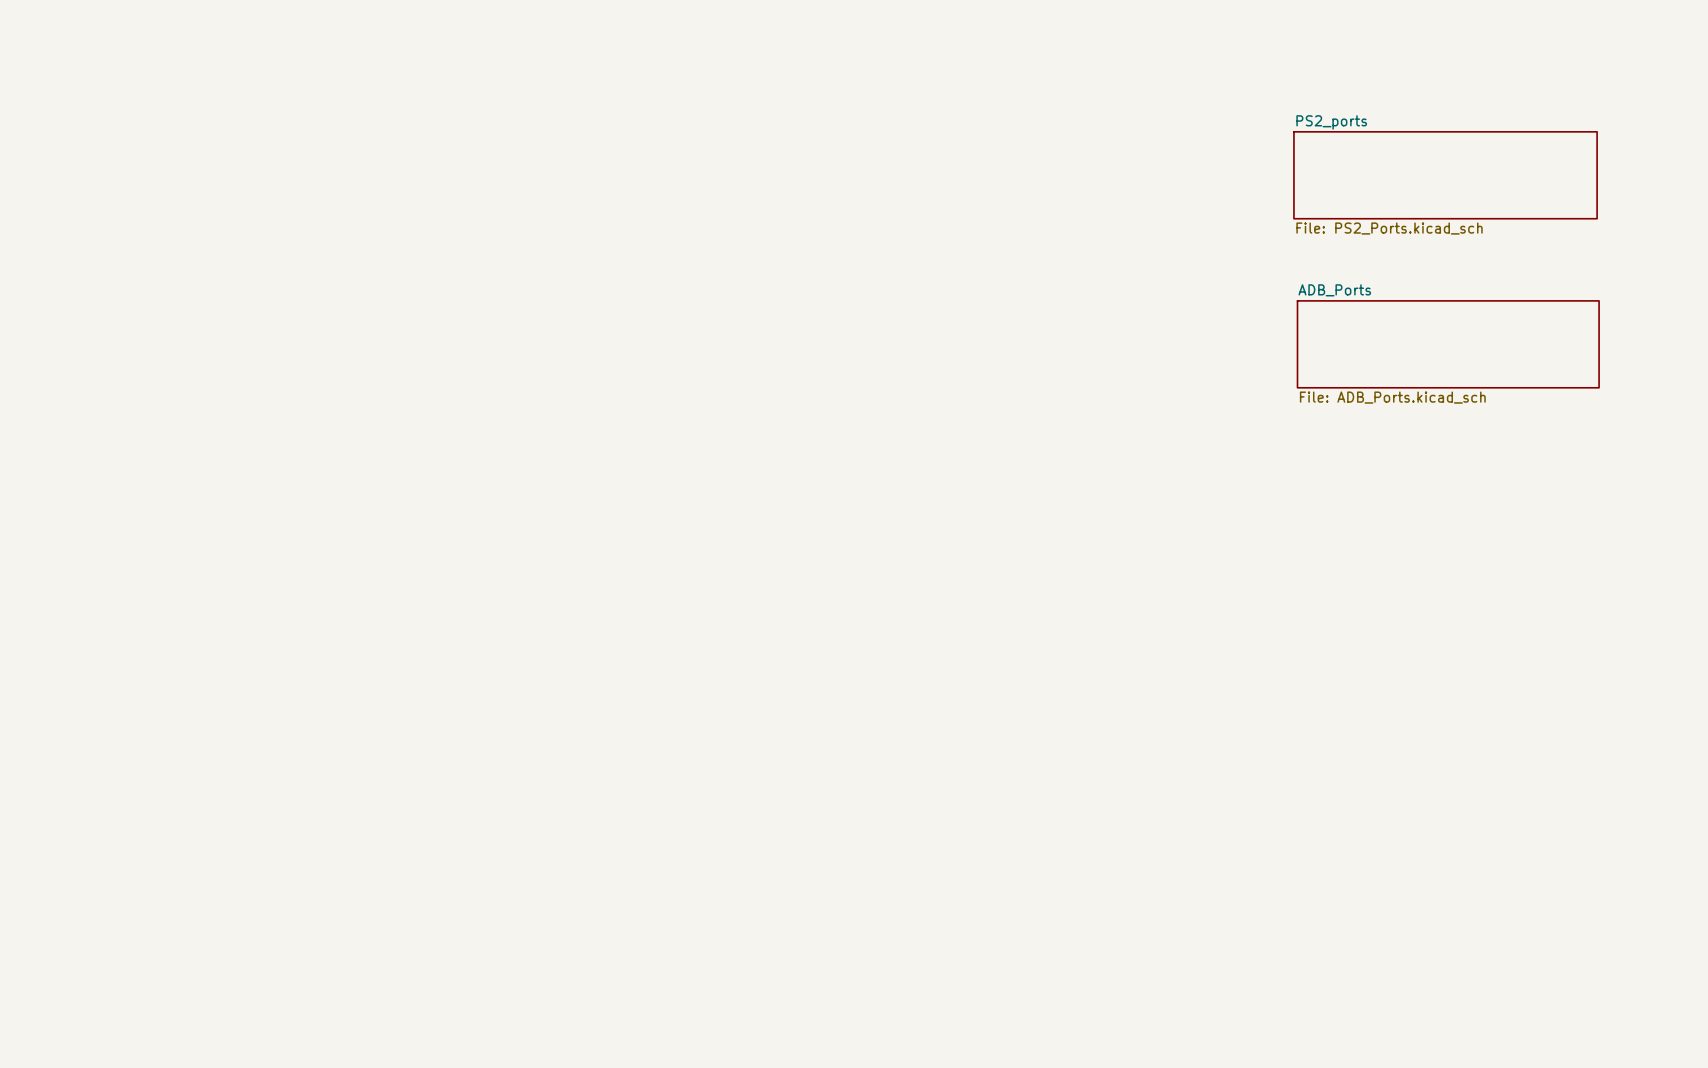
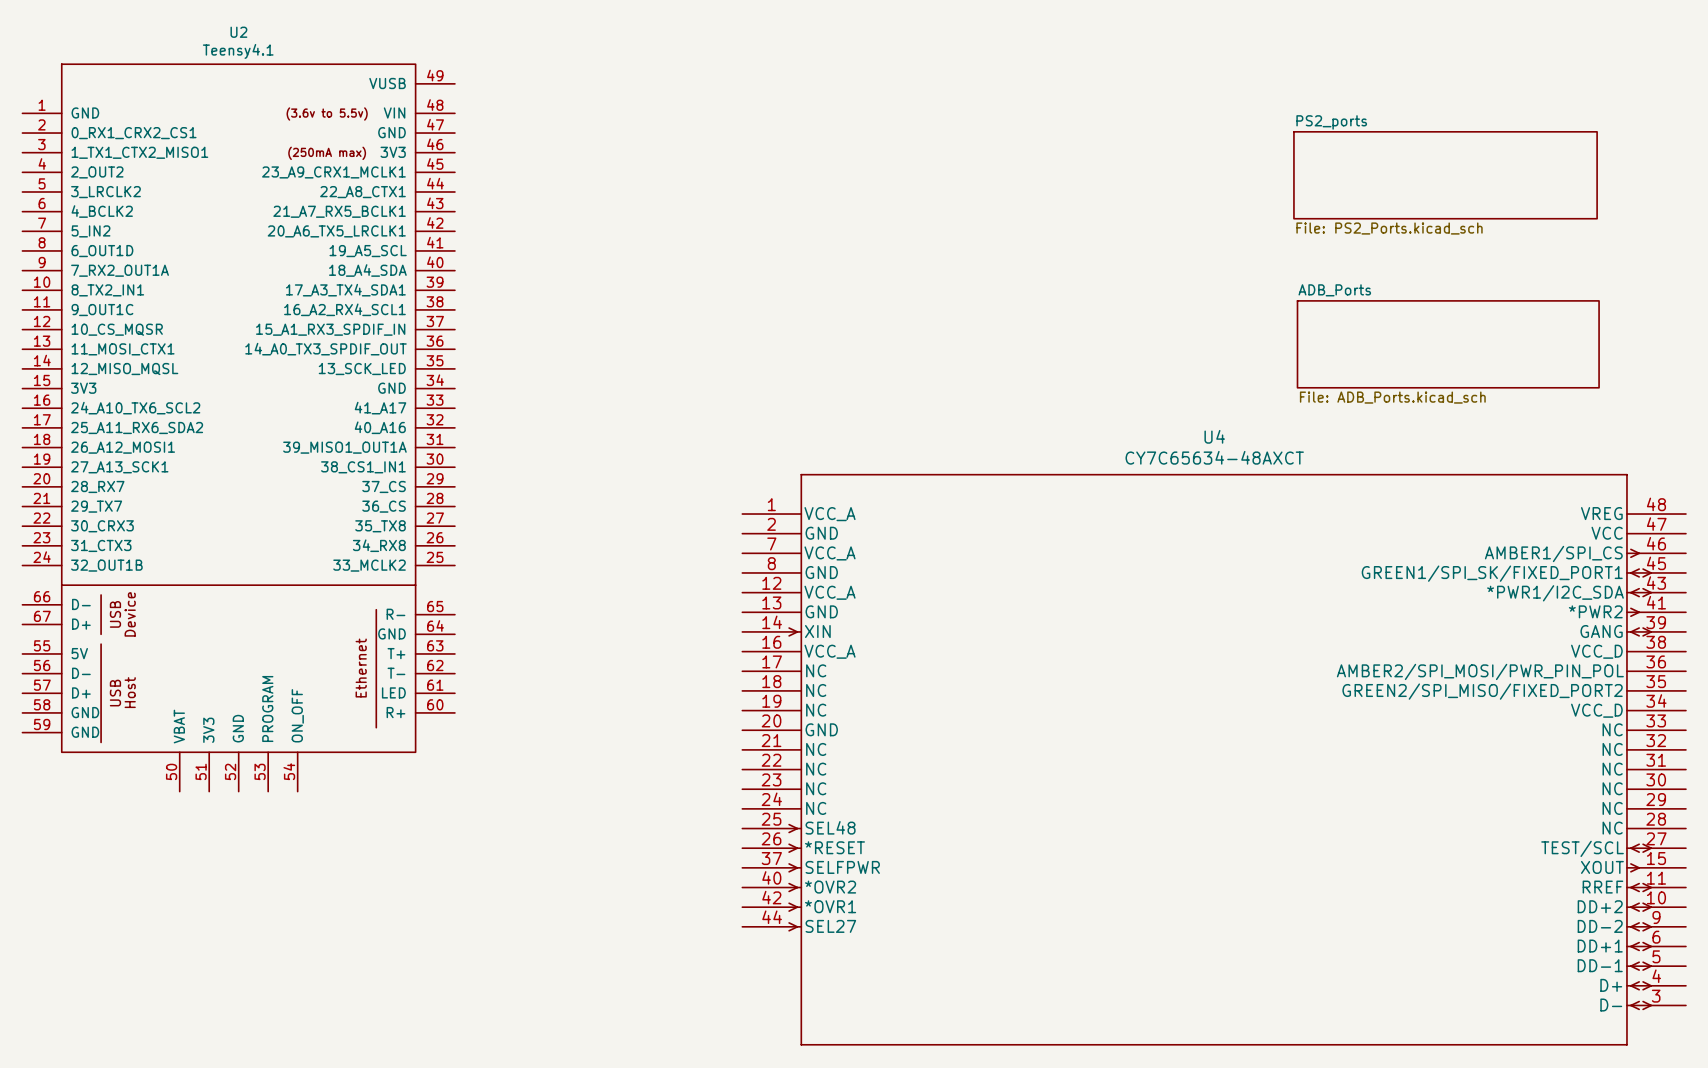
U2: none -> Teensy4.1 (238, 427)
U4: none -> CY7C65634-48AXCT (1214, 759)

